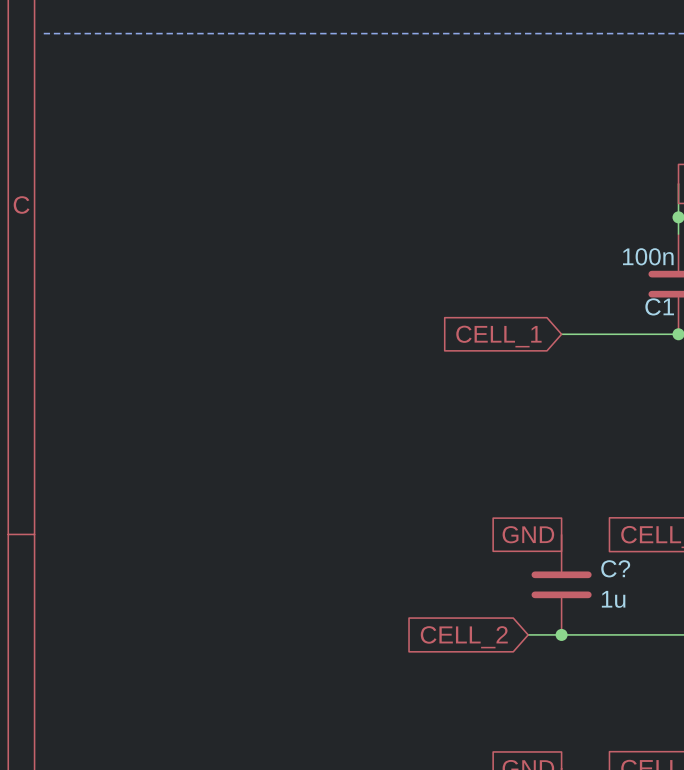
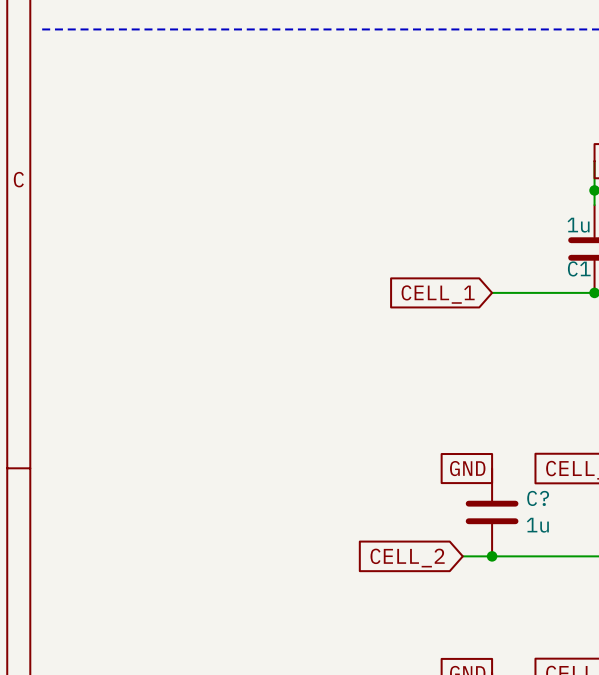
C1 value: 100n (648, 256) -> 1u (578, 225)

